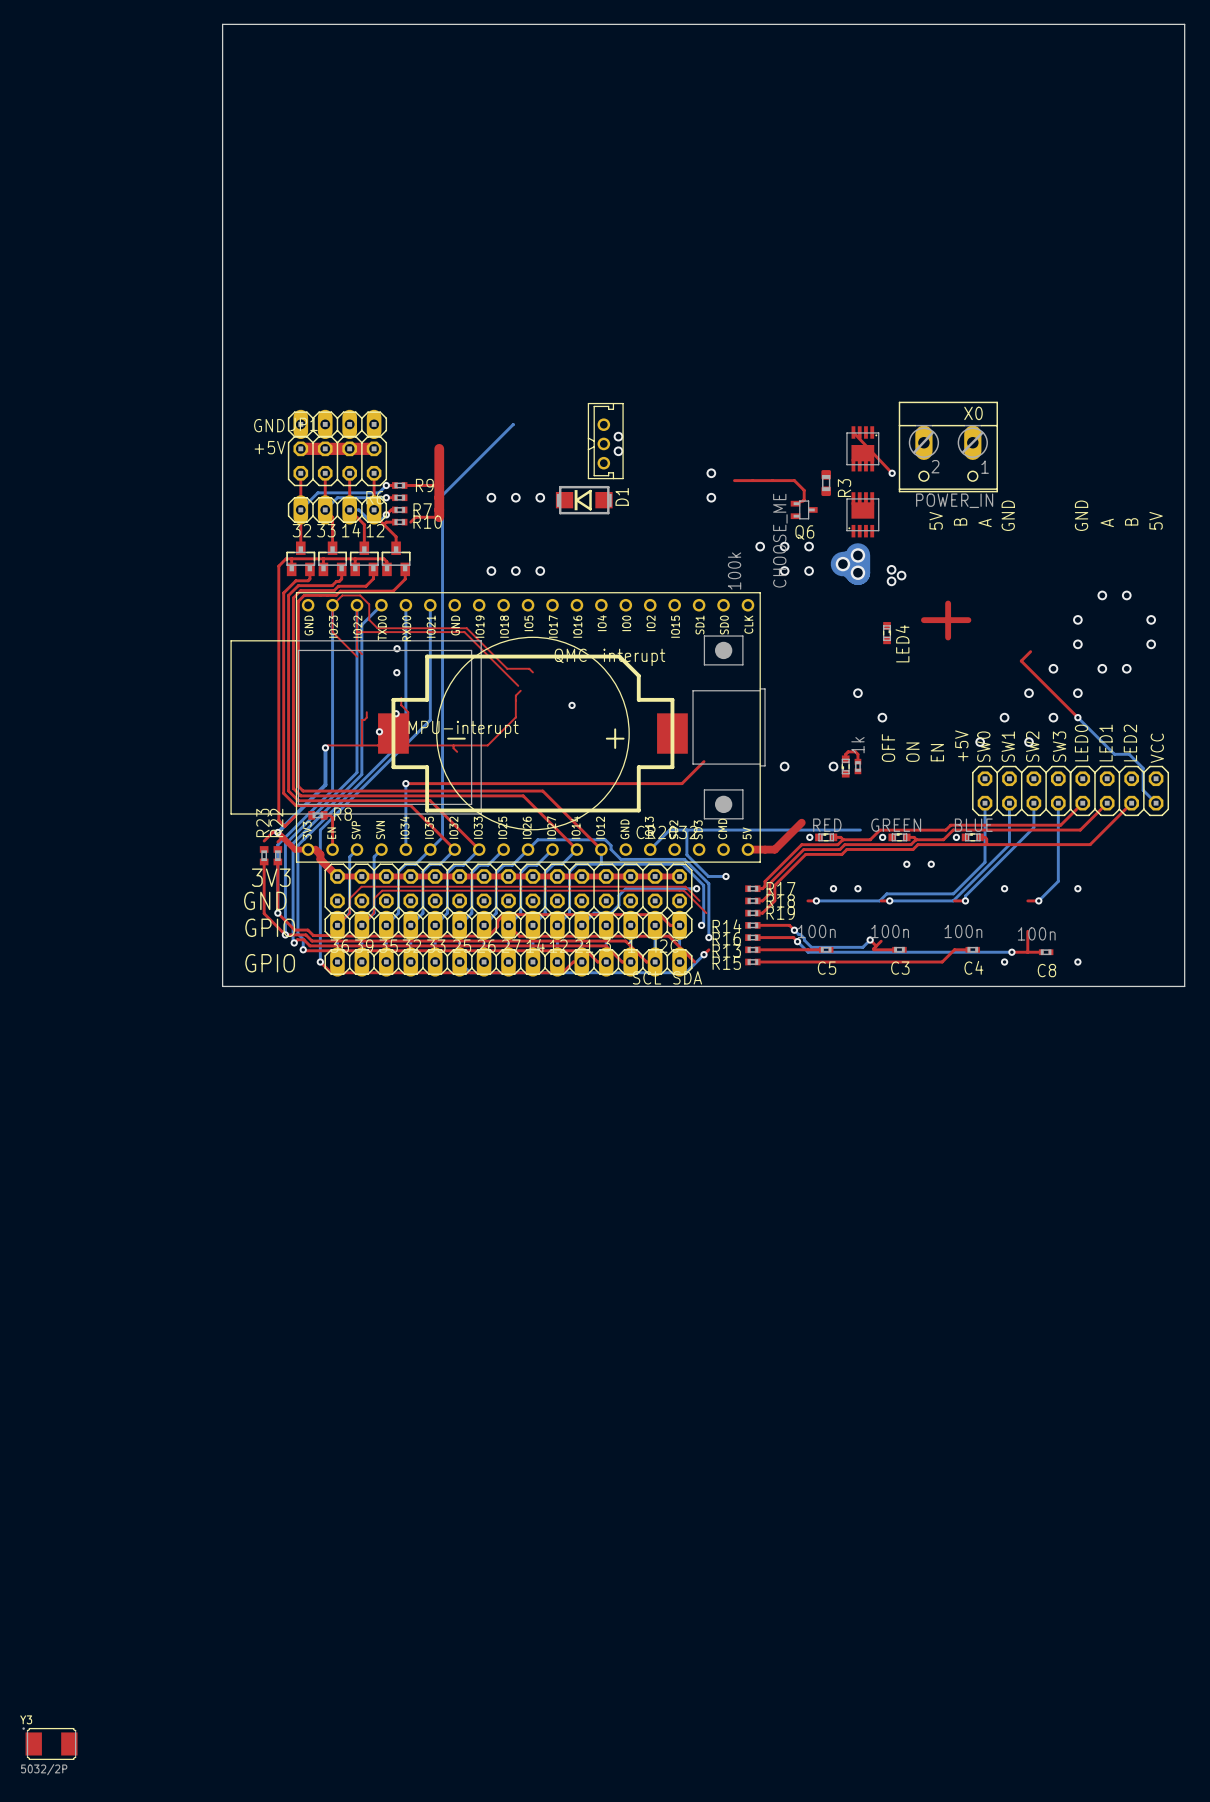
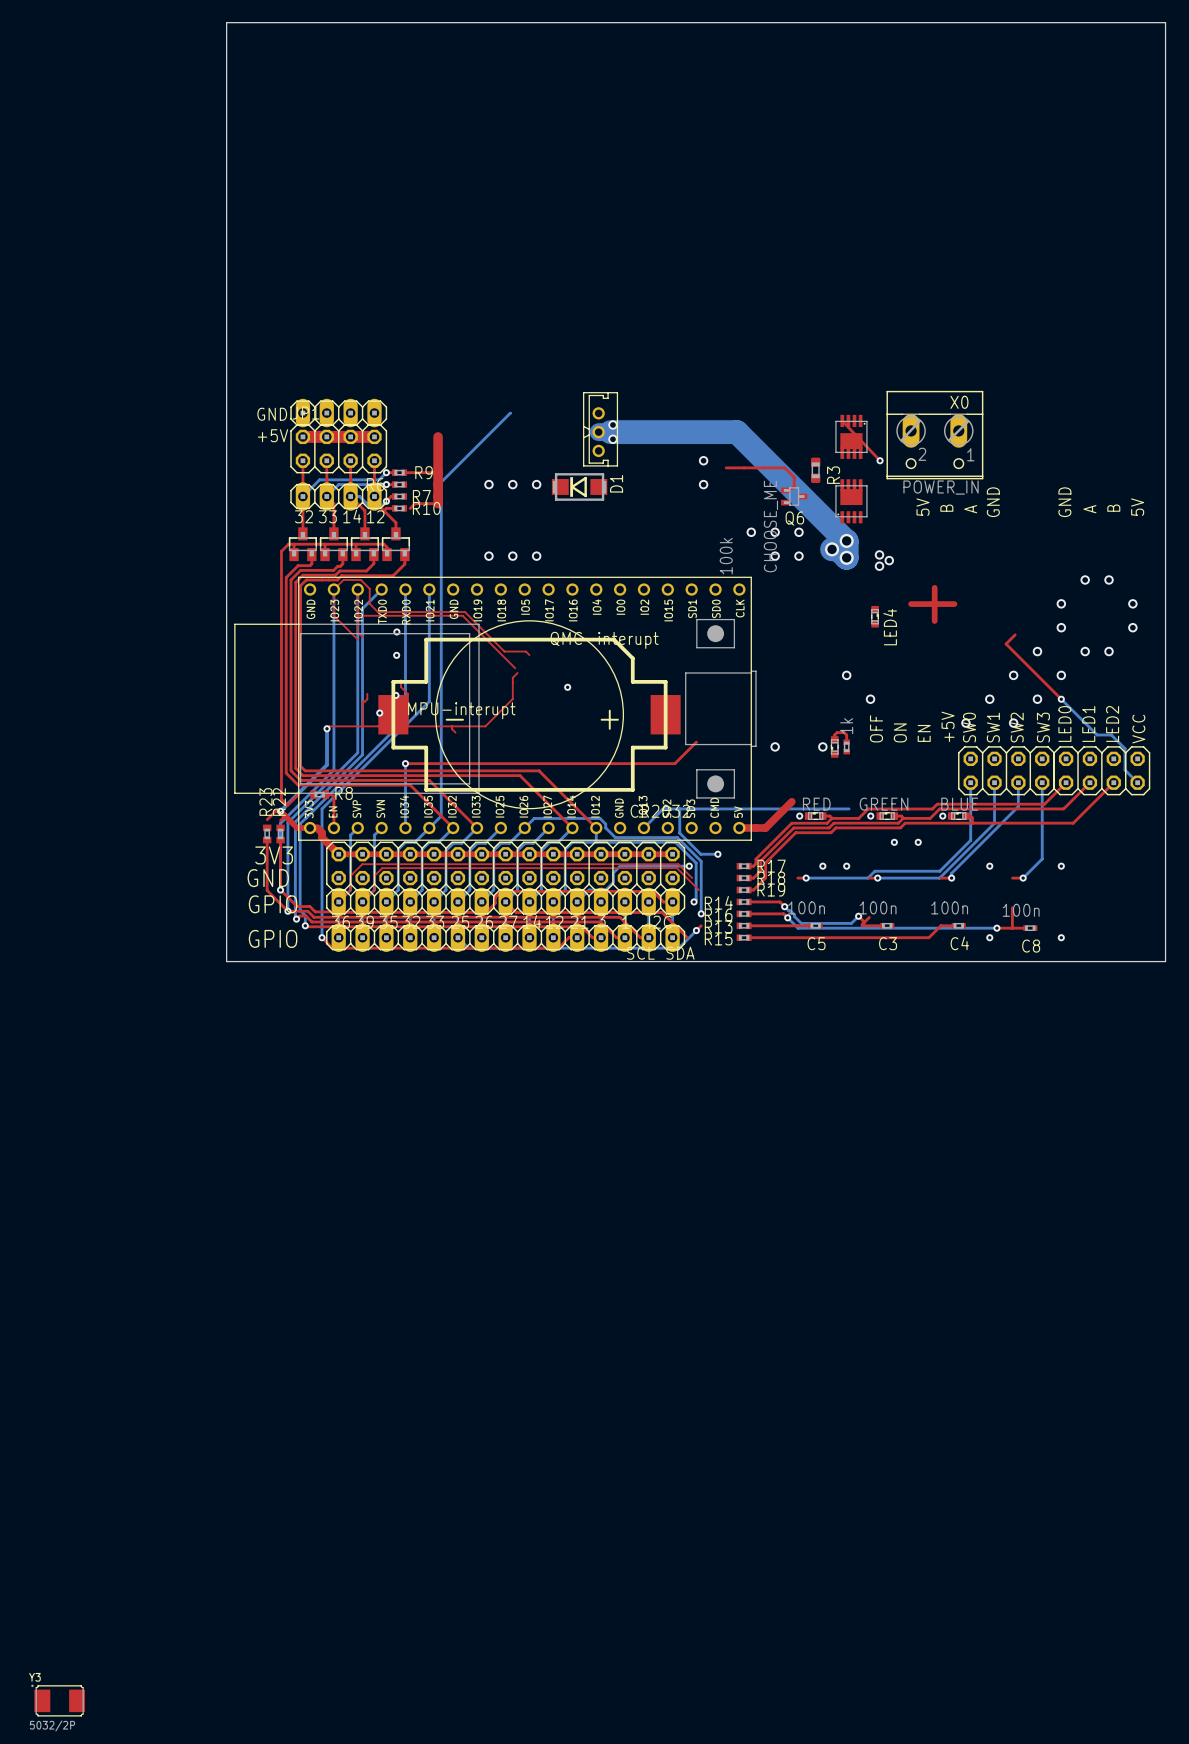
bottom track: none -> (598, 432) (736, 432) (846, 541)

